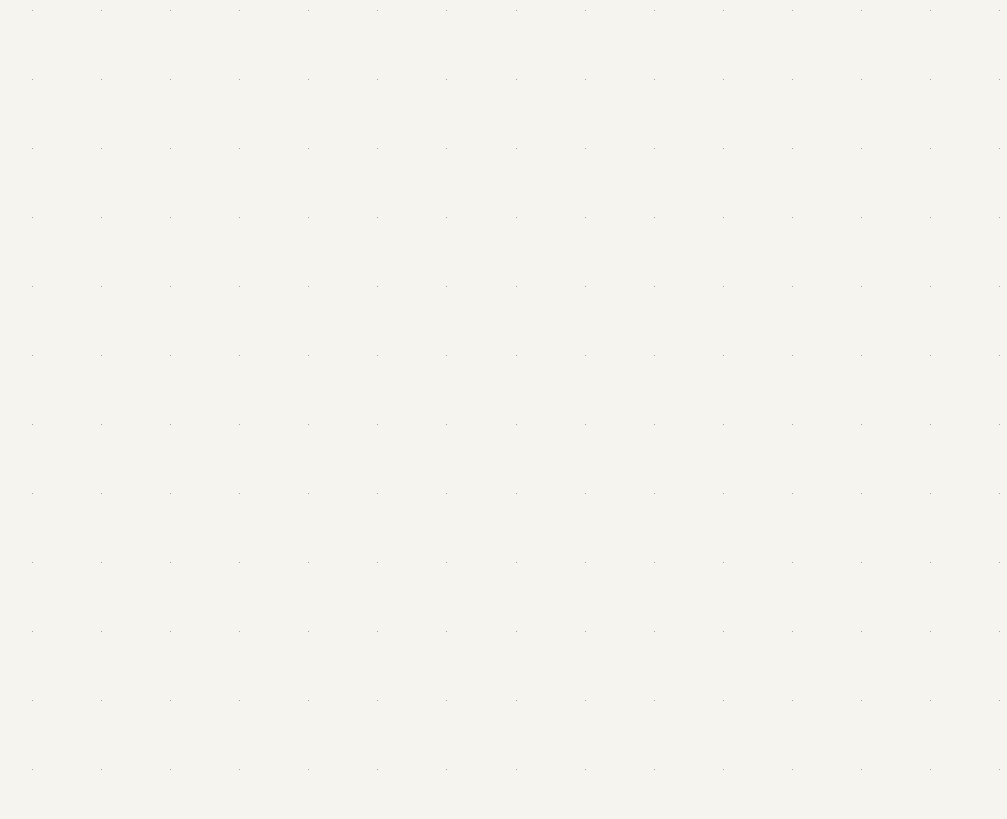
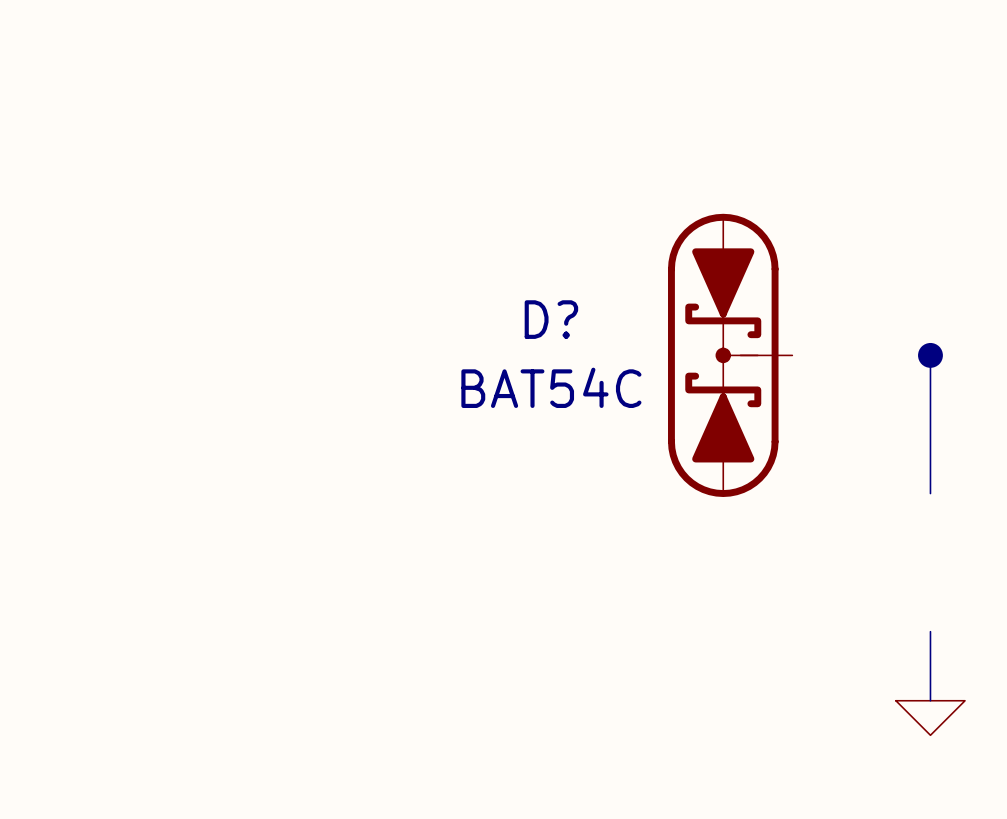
D?: none -> BAT54C (730, 355)
wire: none -> (930, 355) (930, 493)
junction: none -> (930, 355)
wire: none -> (930, 631) (930, 700)
power symbol: none -> (930, 718)

